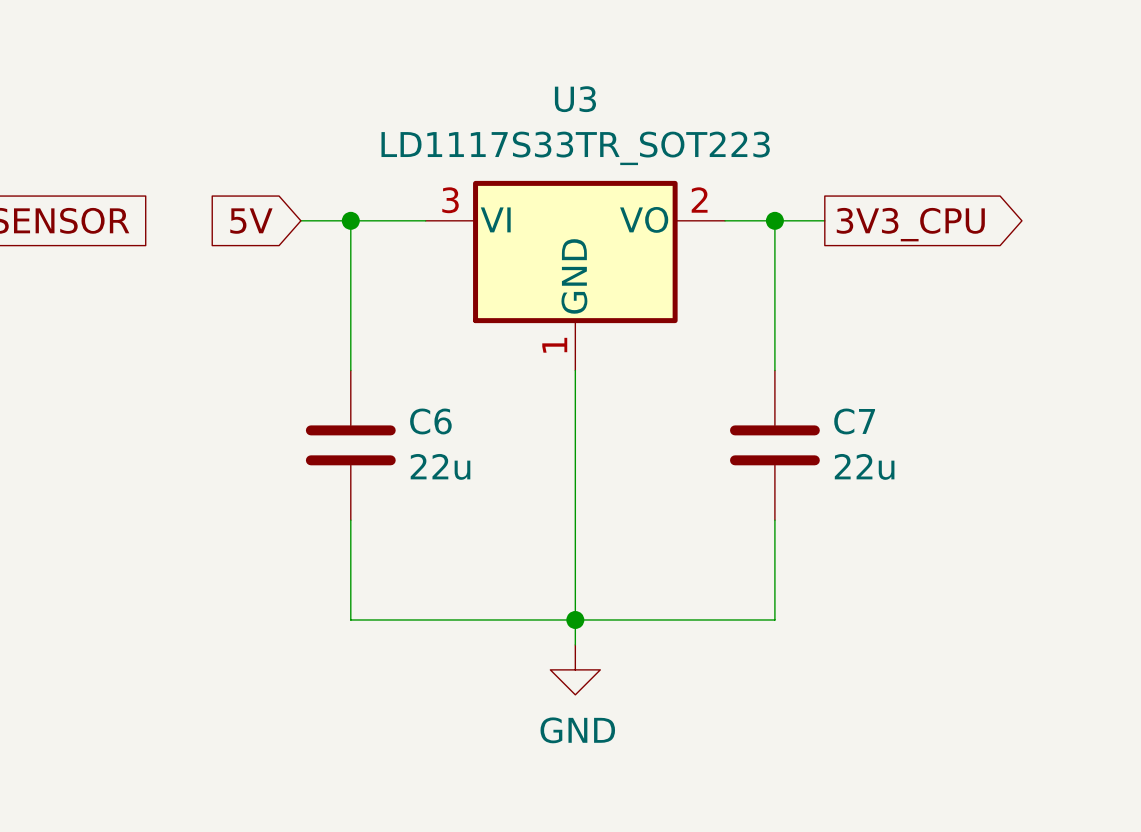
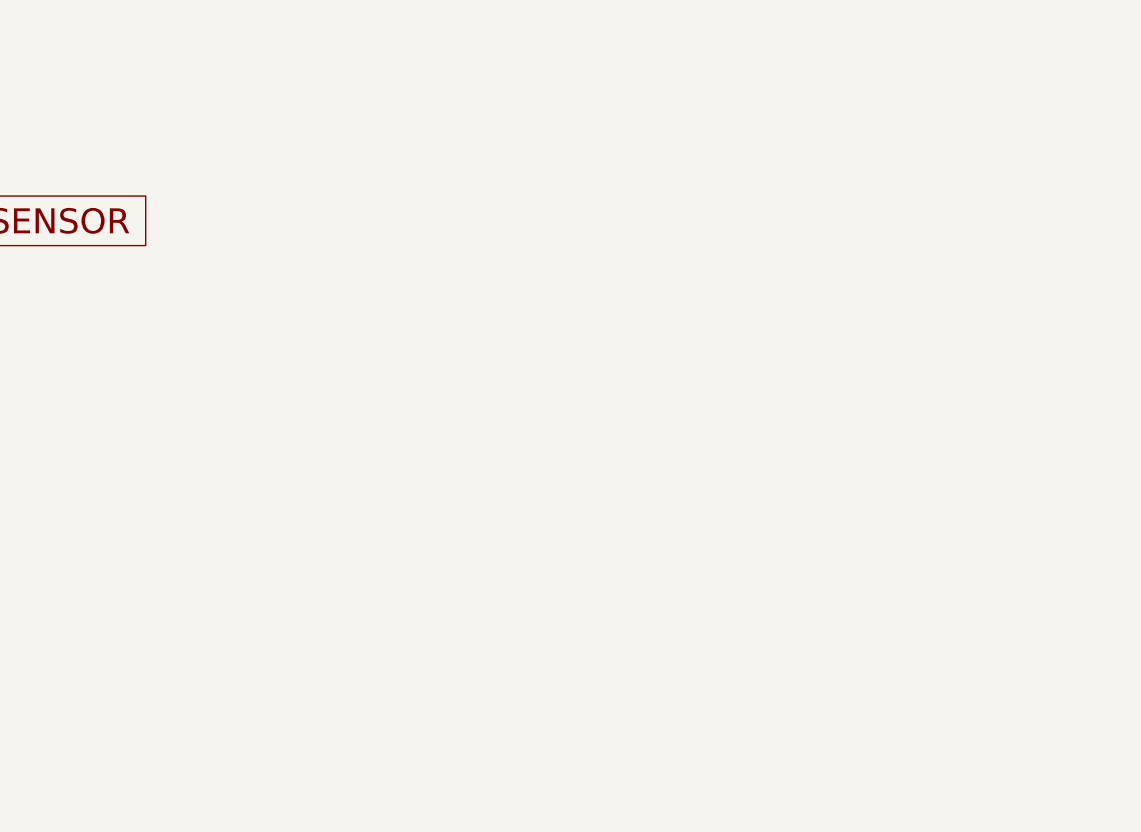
wire: (300, 220) (425, 220) -> none
wire: (350, 220) (350, 370) -> none
junction: (350, 220) -> none
wire: (725, 220) (824, 220) -> none
wire: (774, 220) (774, 370) -> none
junction: (774, 220) -> none
global label: 5V (251, 221) -> none
global label: 3V3_CPU (910, 224) -> none
U3: LD1117S33TR_SOT223 (575, 275) -> none
wire: (575, 370) (575, 644) -> none
C6: 22u (350, 445) -> none
C7: 22u (774, 445) -> none
wire: (350, 520) (350, 619) (774, 619) (774, 520) -> none
junction: (575, 619) -> none
power symbol: GND (575, 669) -> none

